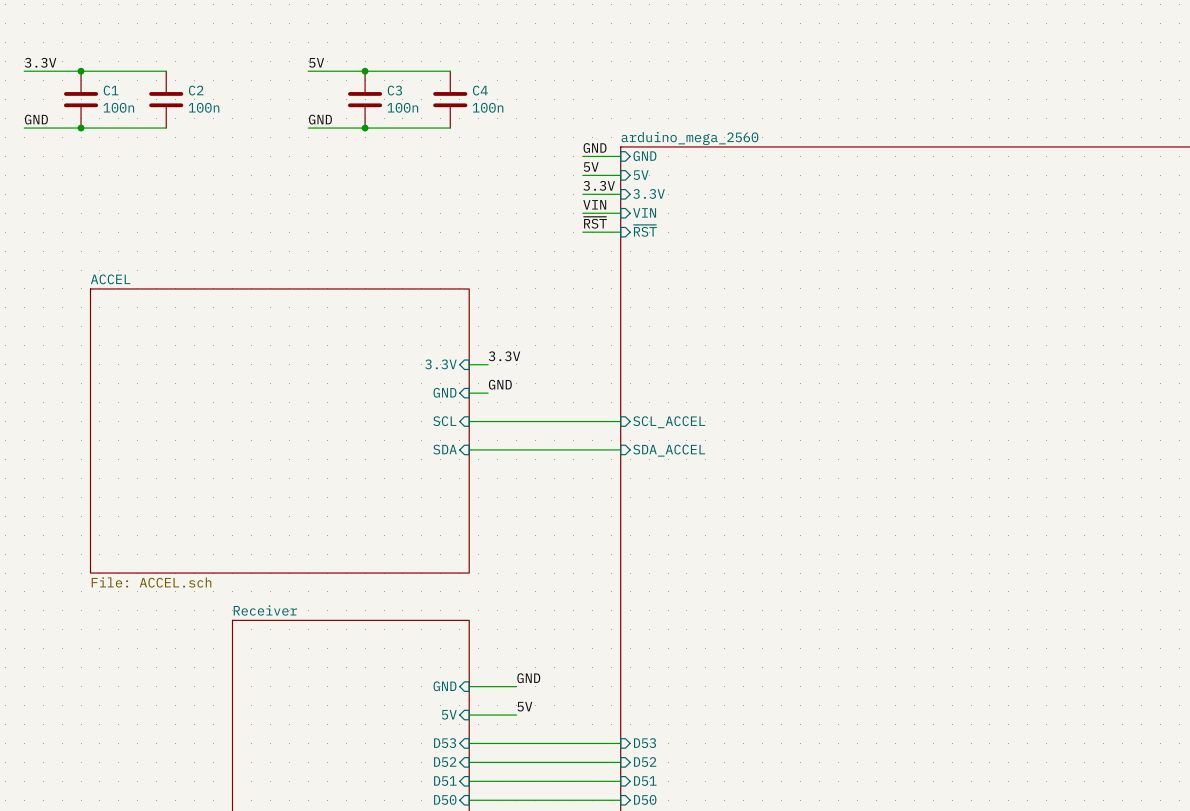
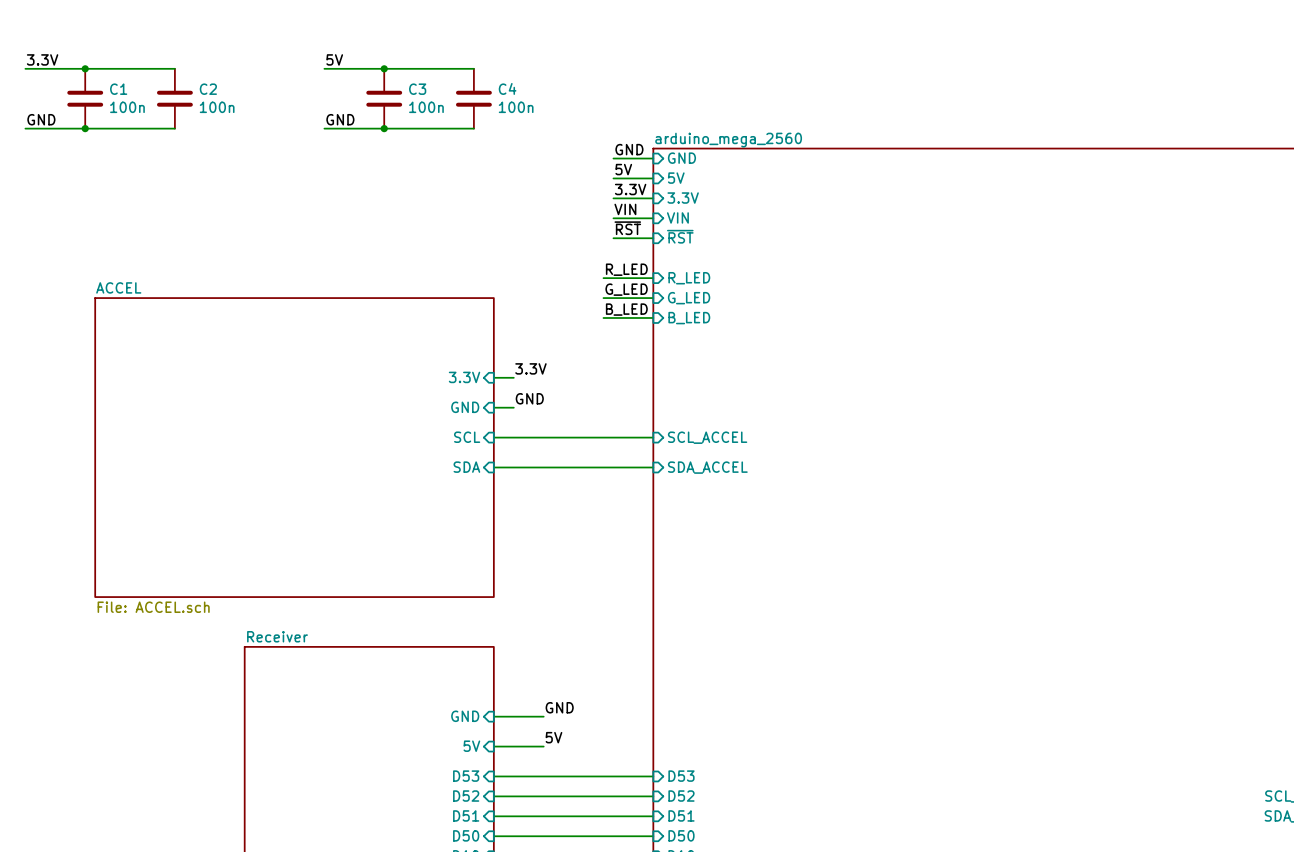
label: none -> R_LED (626, 269)
wire: none -> (603, 278) (653, 278)
sheet pin: none -> R_LED (689, 278)
label: none -> G_LED (626, 289)
wire: none -> (603, 298) (653, 298)
sheet pin: none -> G_LED (689, 298)
label: none -> B_LED (626, 309)
wire: none -> (603, 317) (653, 317)
sheet pin: none -> B_LED (689, 318)

